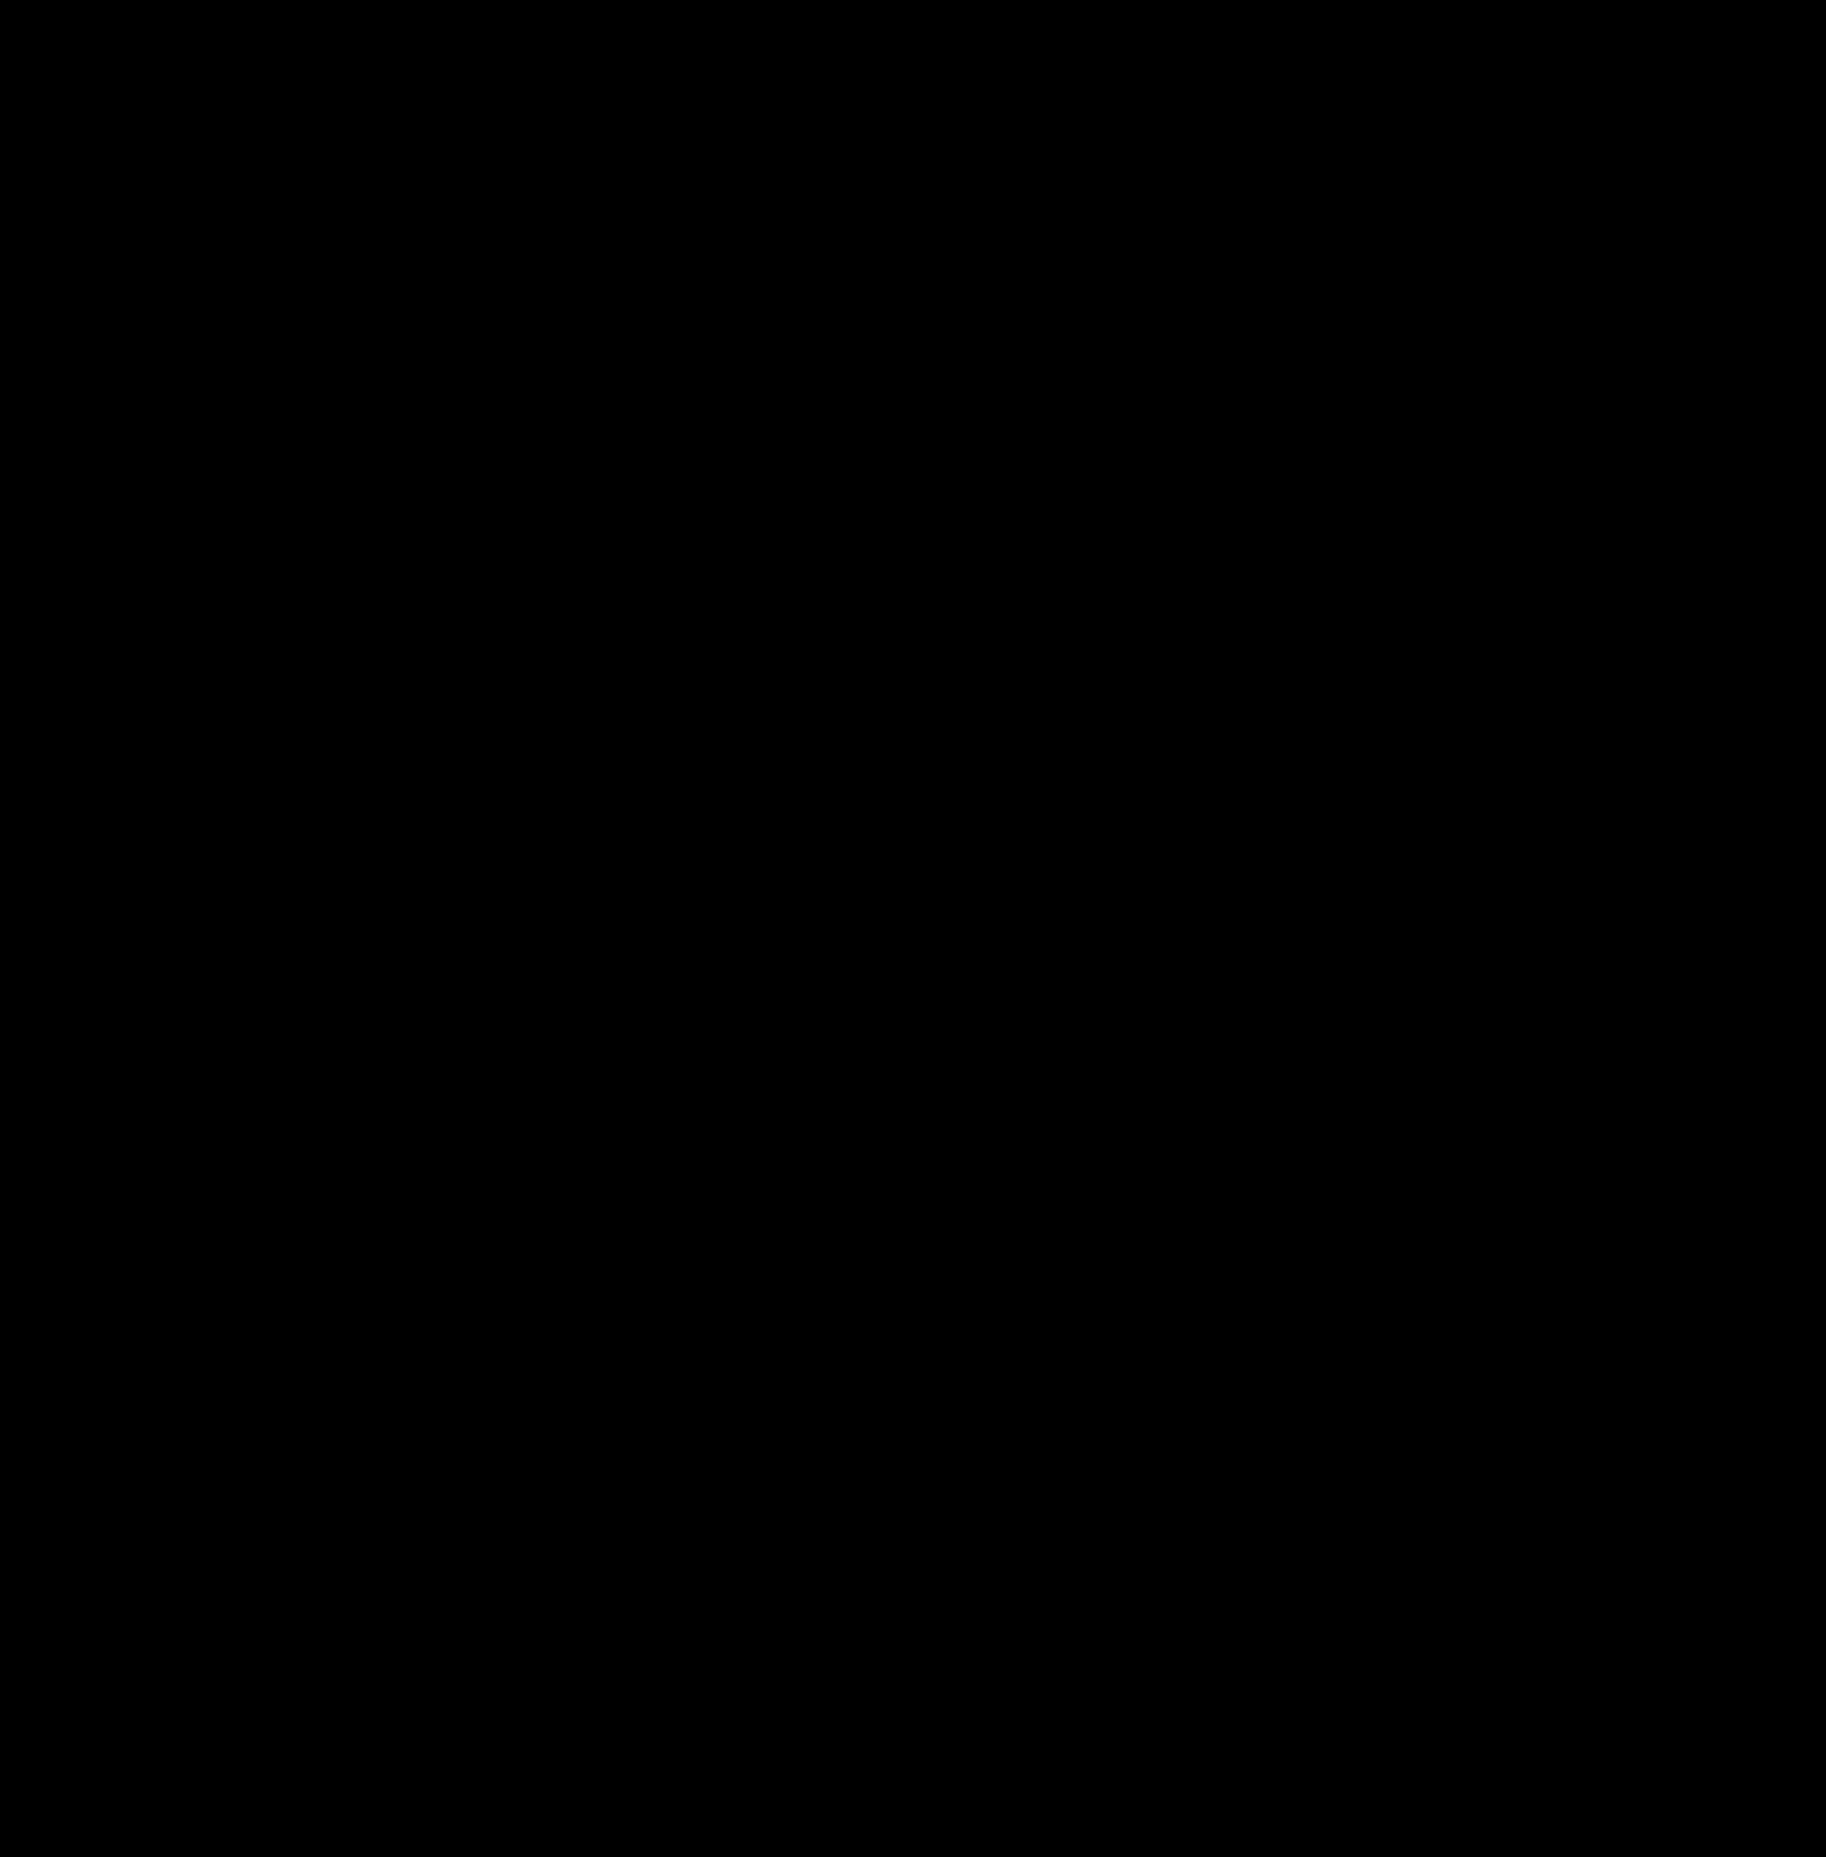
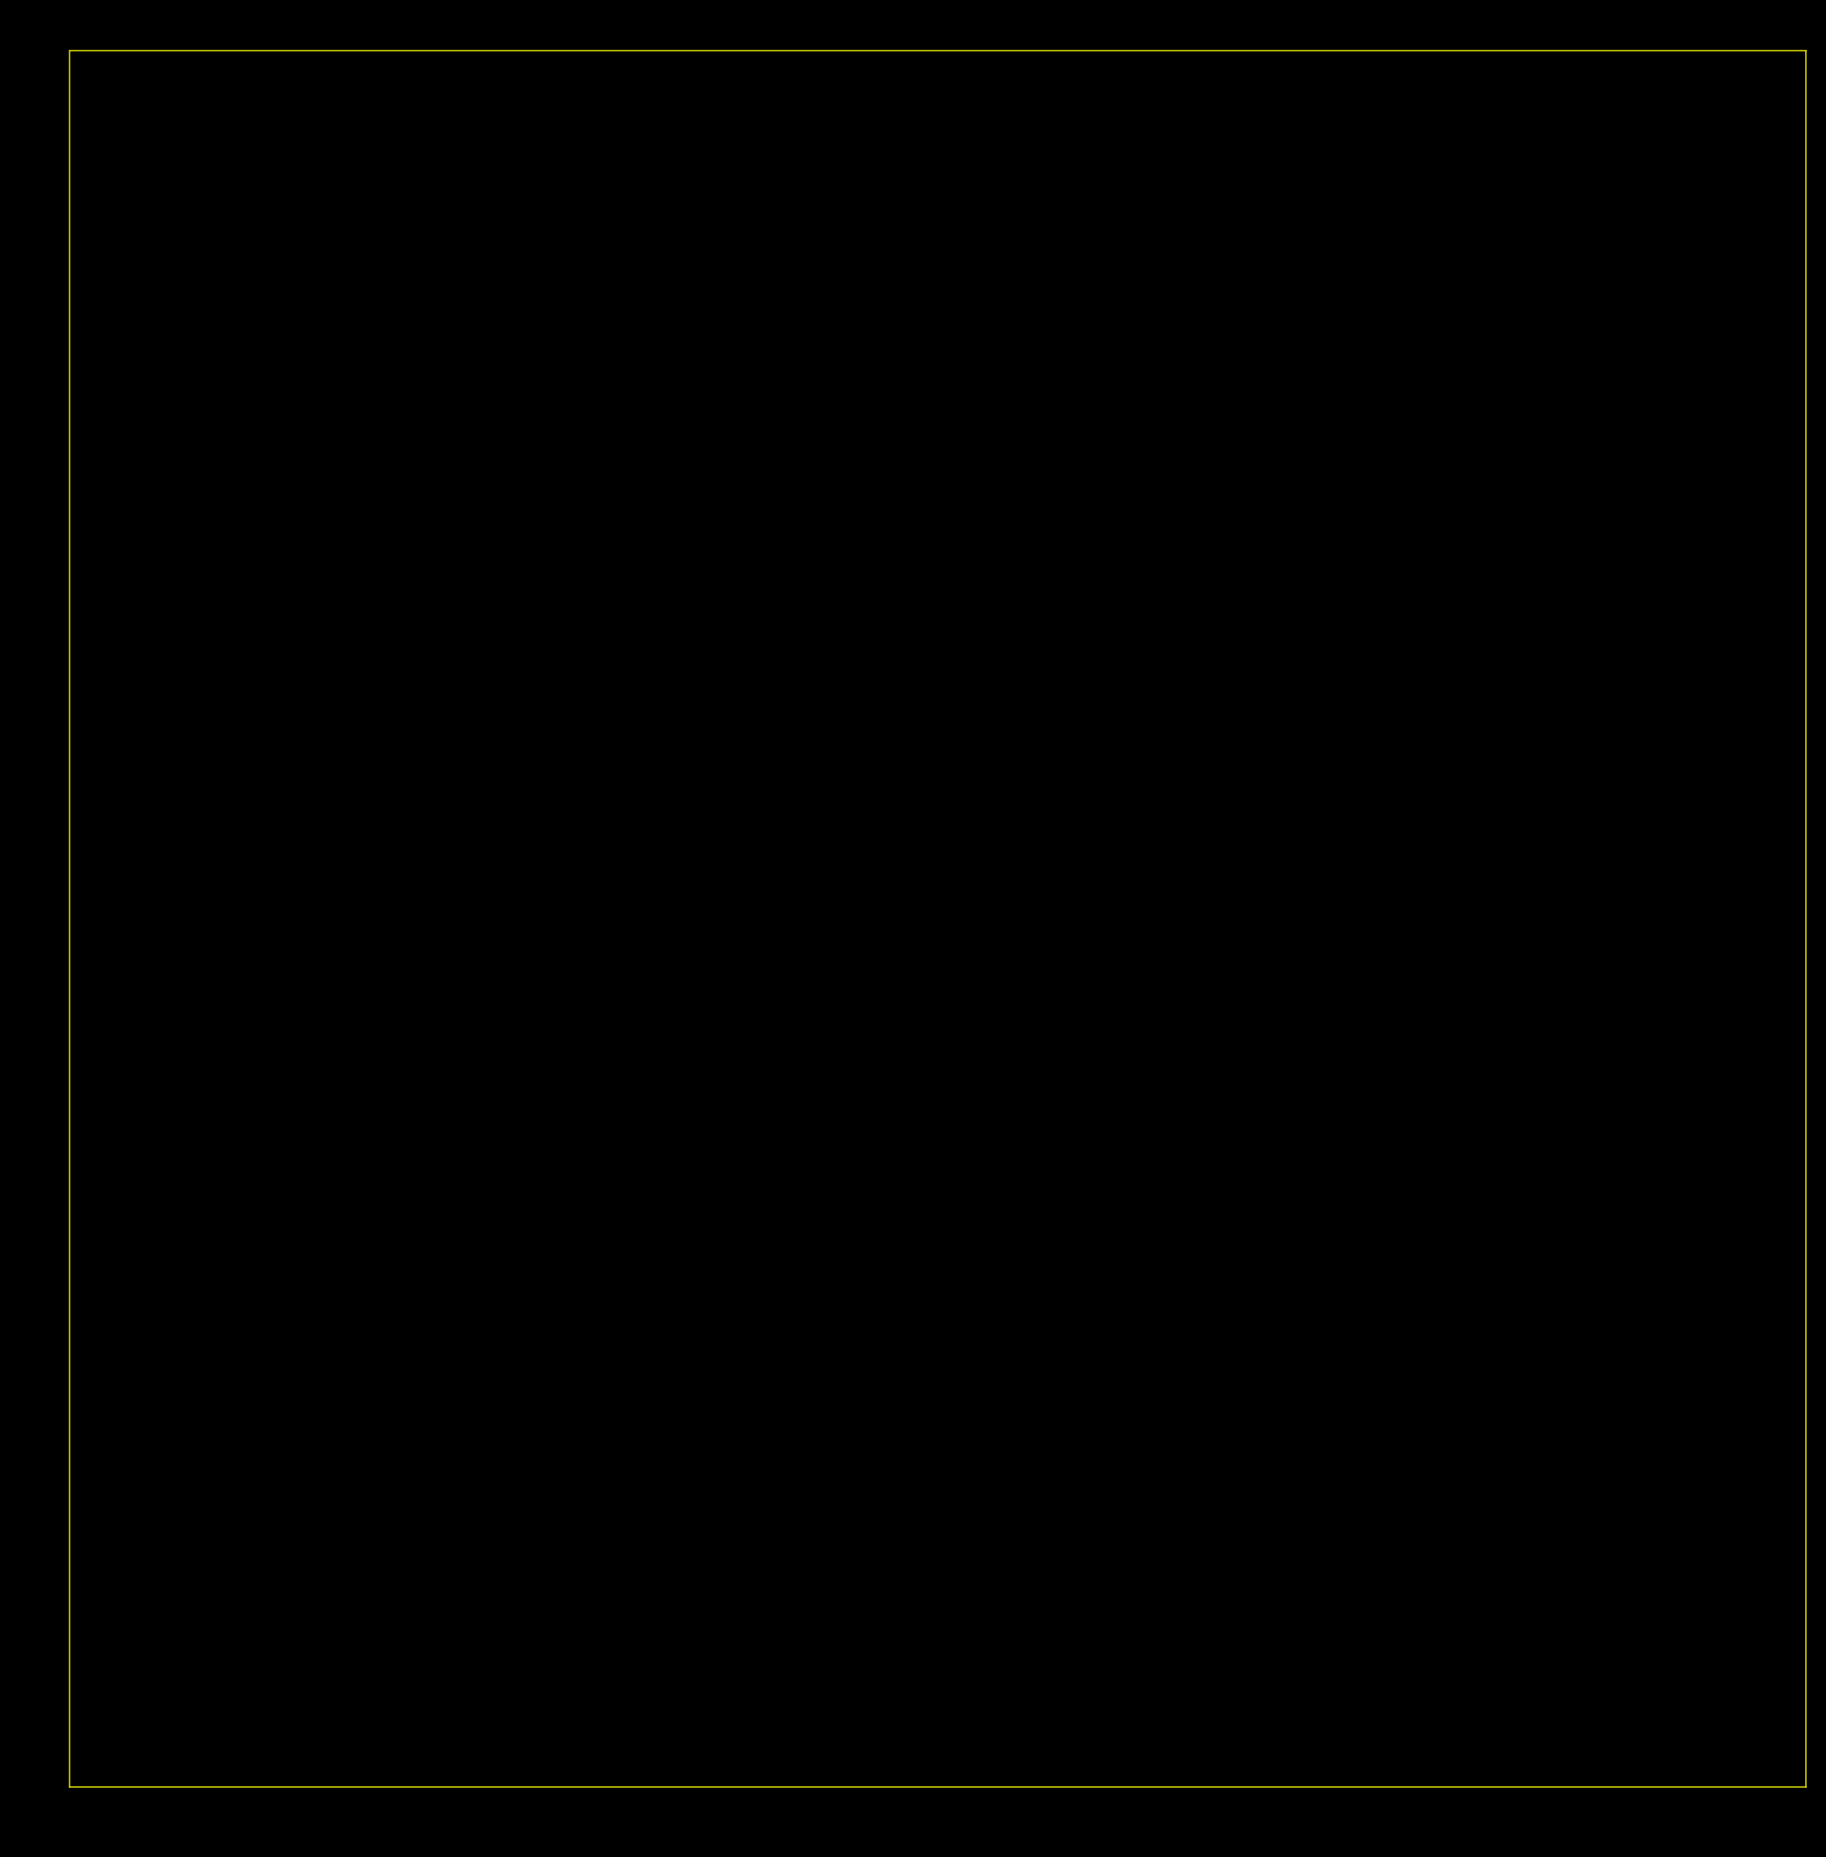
board edge: none -> (69, 50) (1805, 50) (1805, 1786) (69, 1786) (69, 50)

